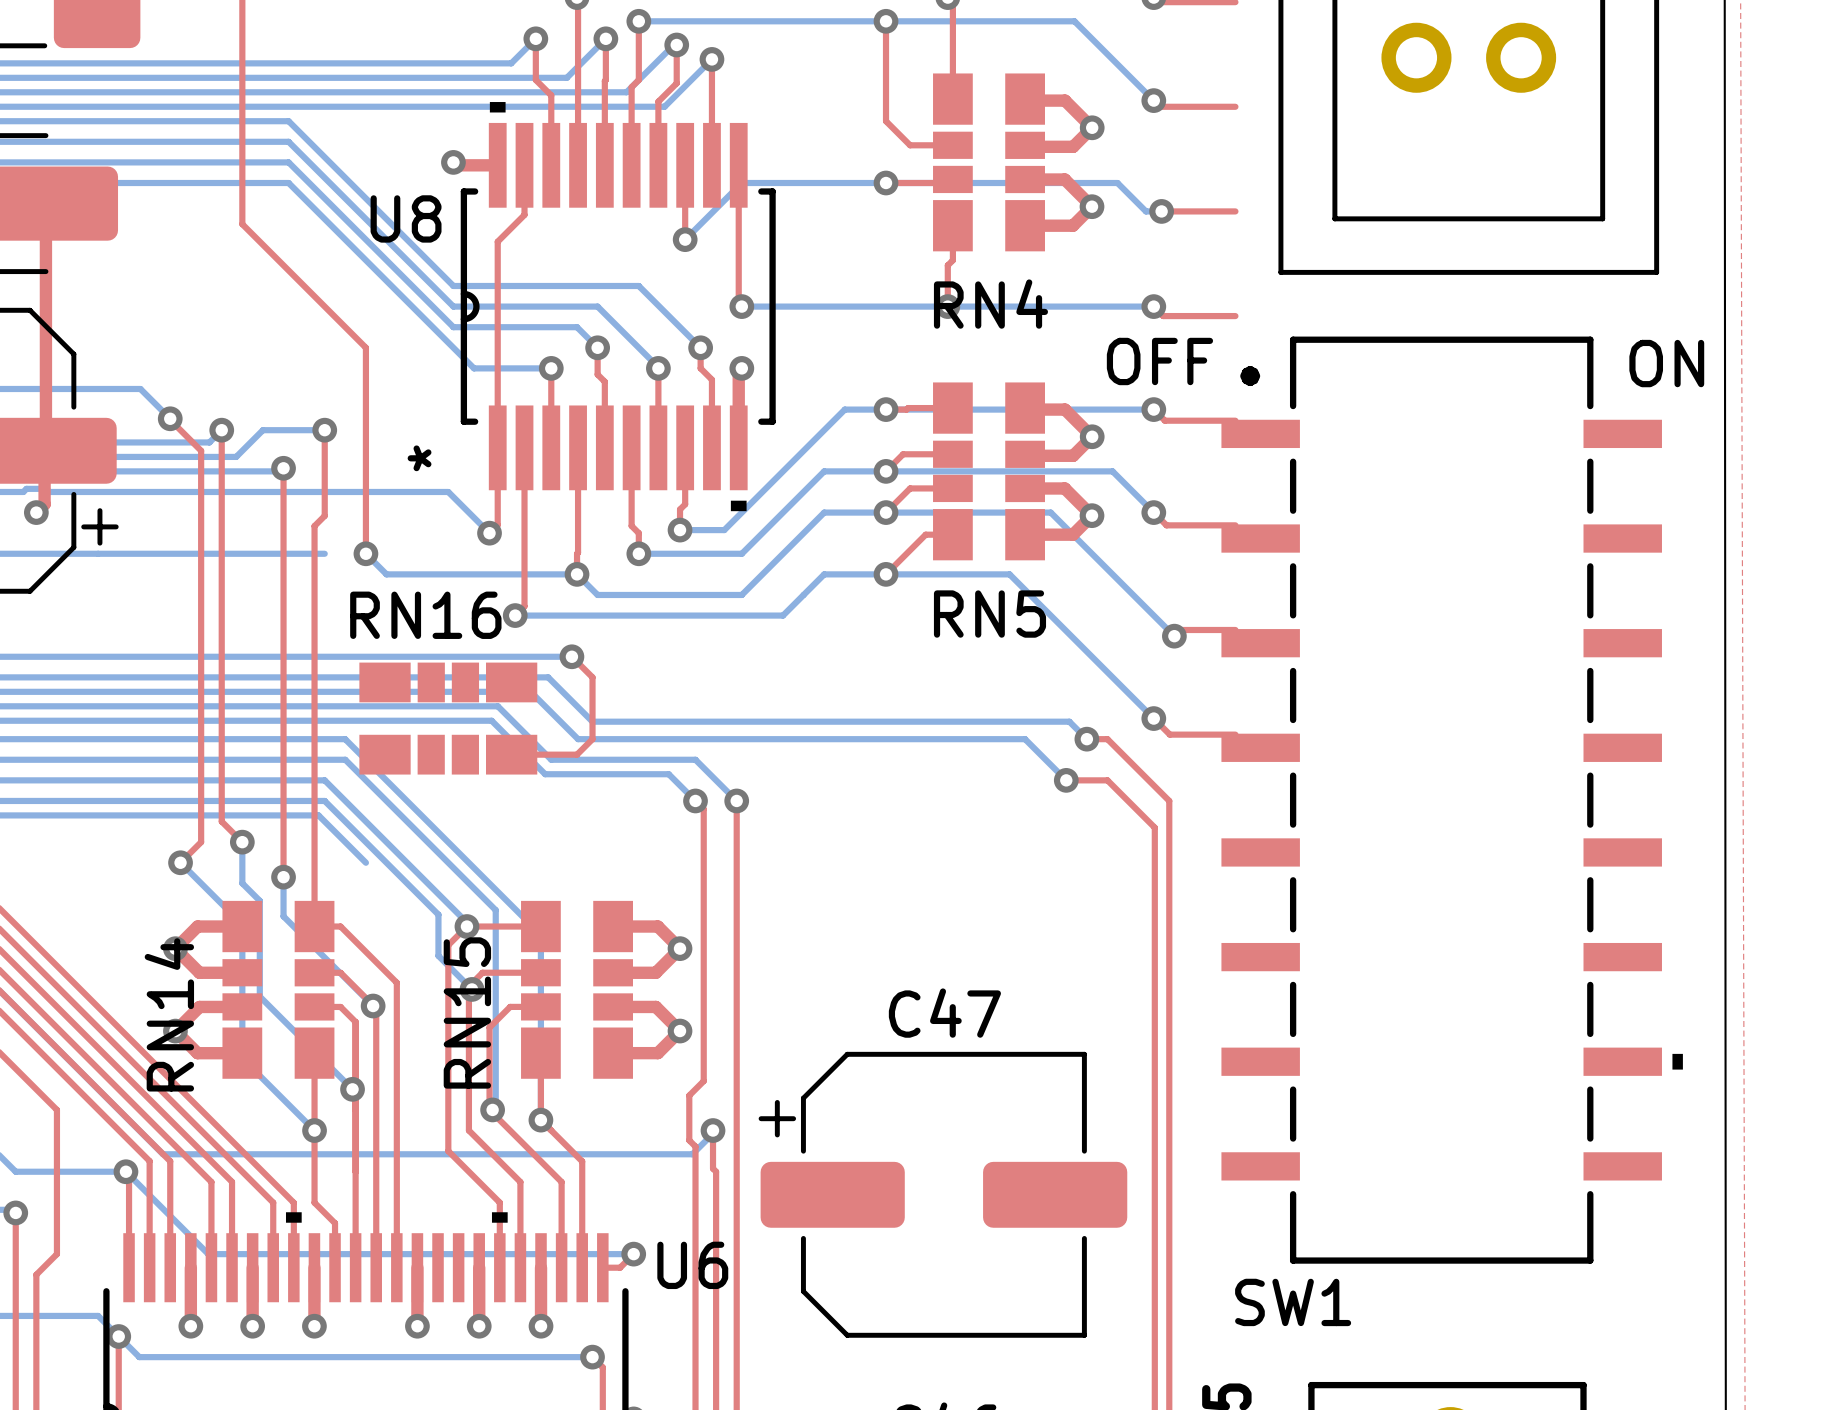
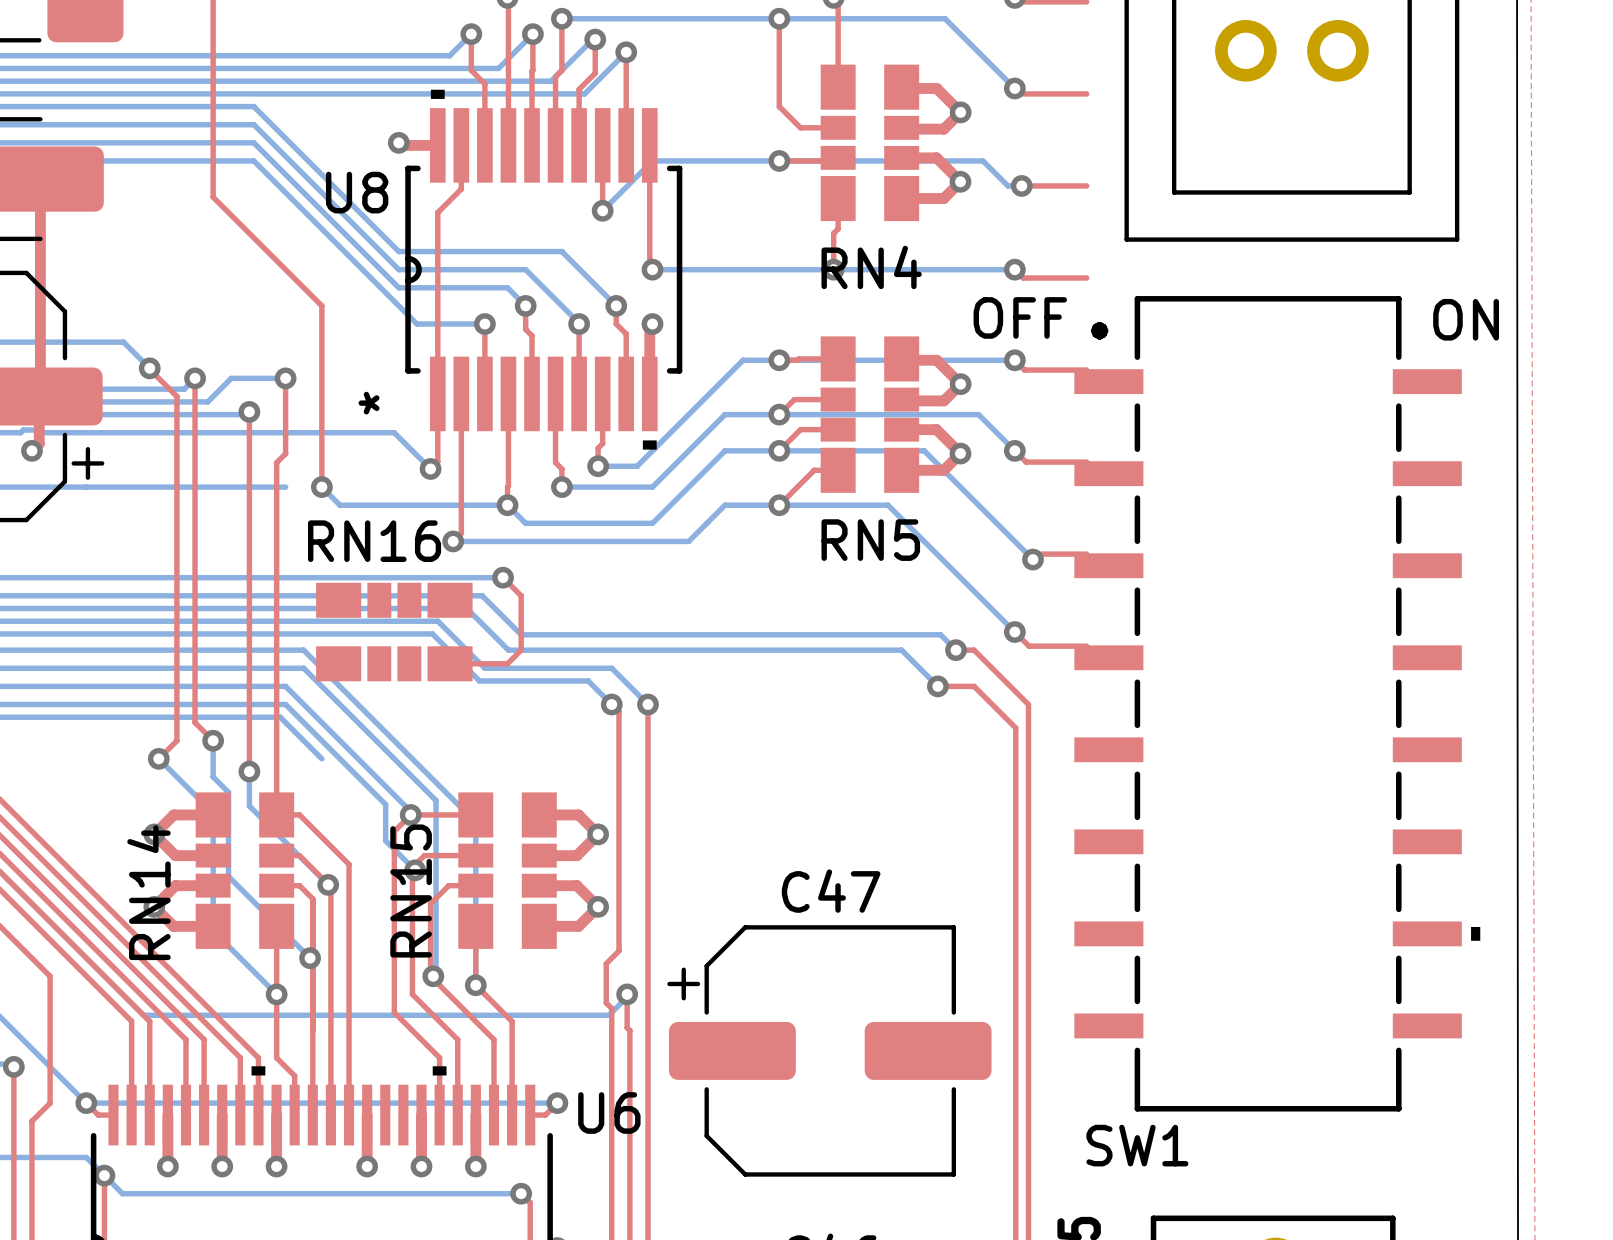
bottom track: (15, 1171) (125, 1171) (208, 1254) -> (13, 1030) (86, 1103) (183, 1103)
top track: (125, 1171) (129, 1174) (129, 1267) -> (86, 1103) (98, 1115) (113, 1115)
via position: (125, 1171) -> (86, 1103)

